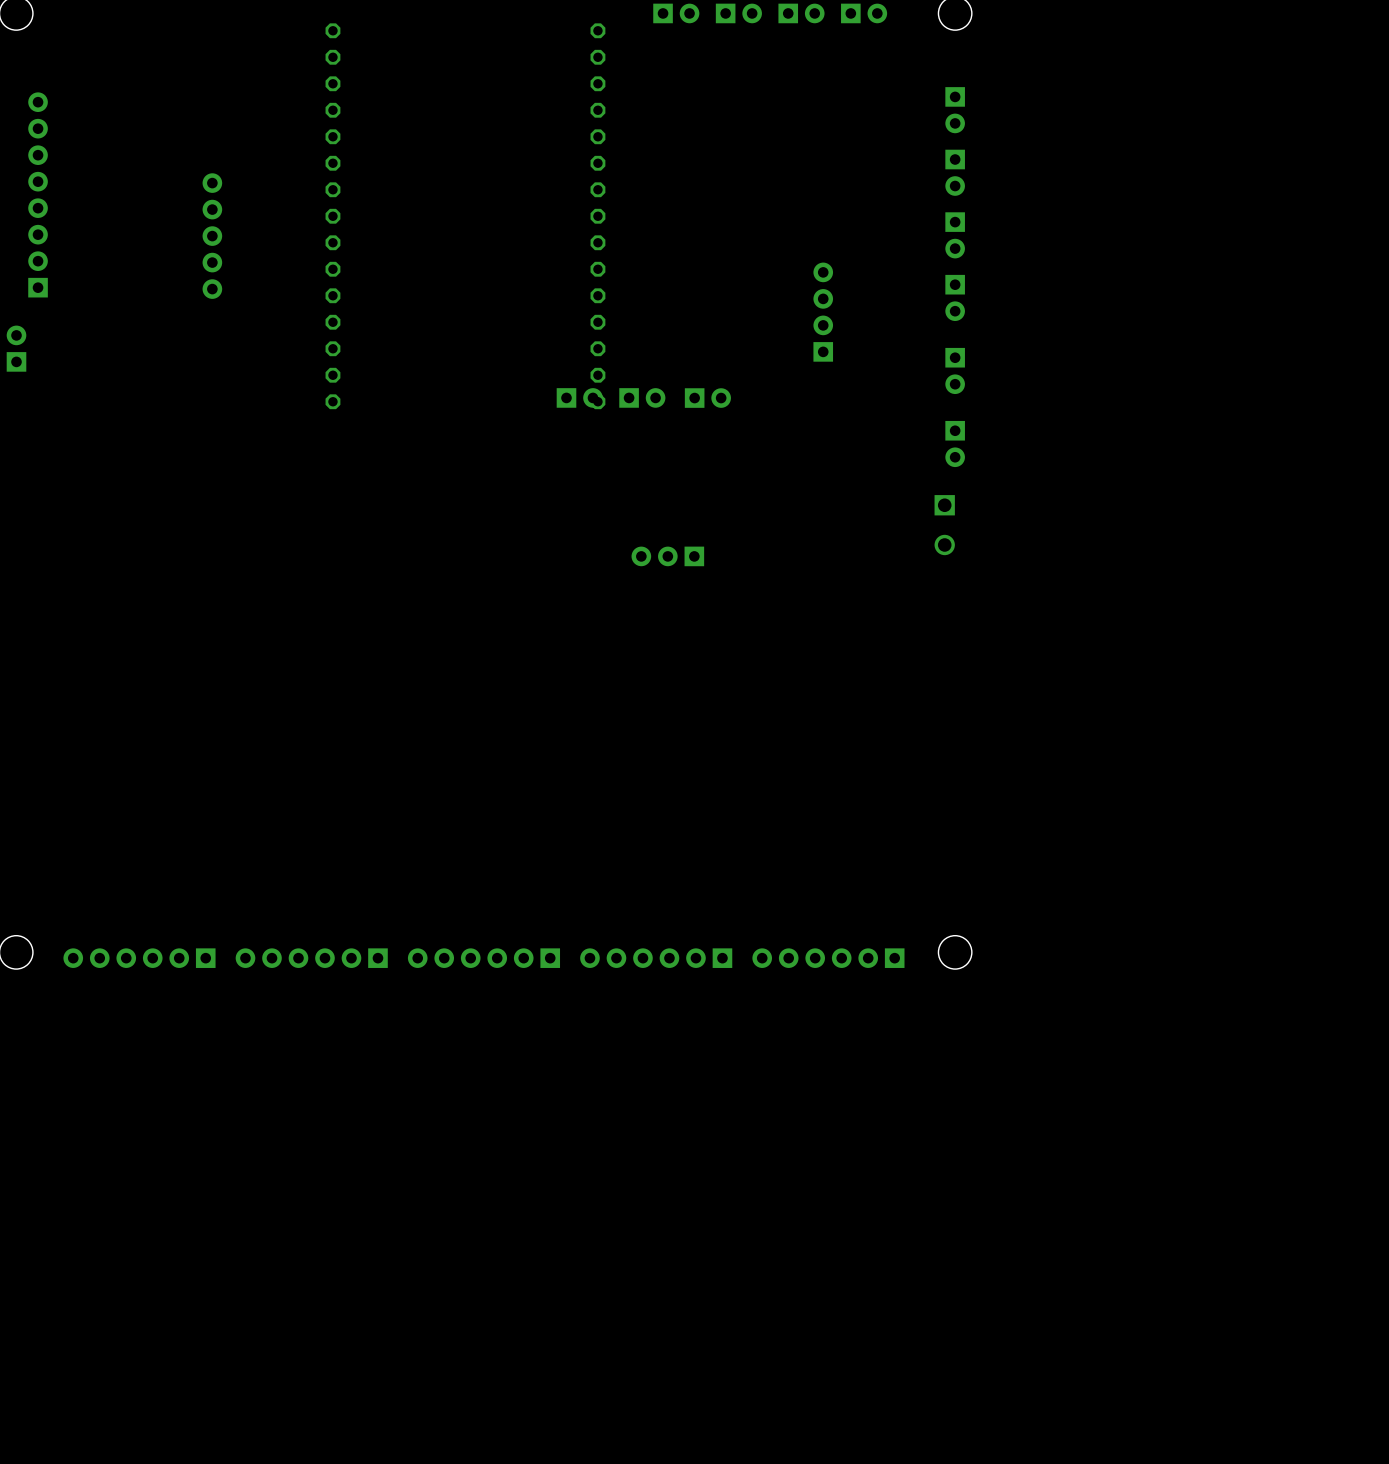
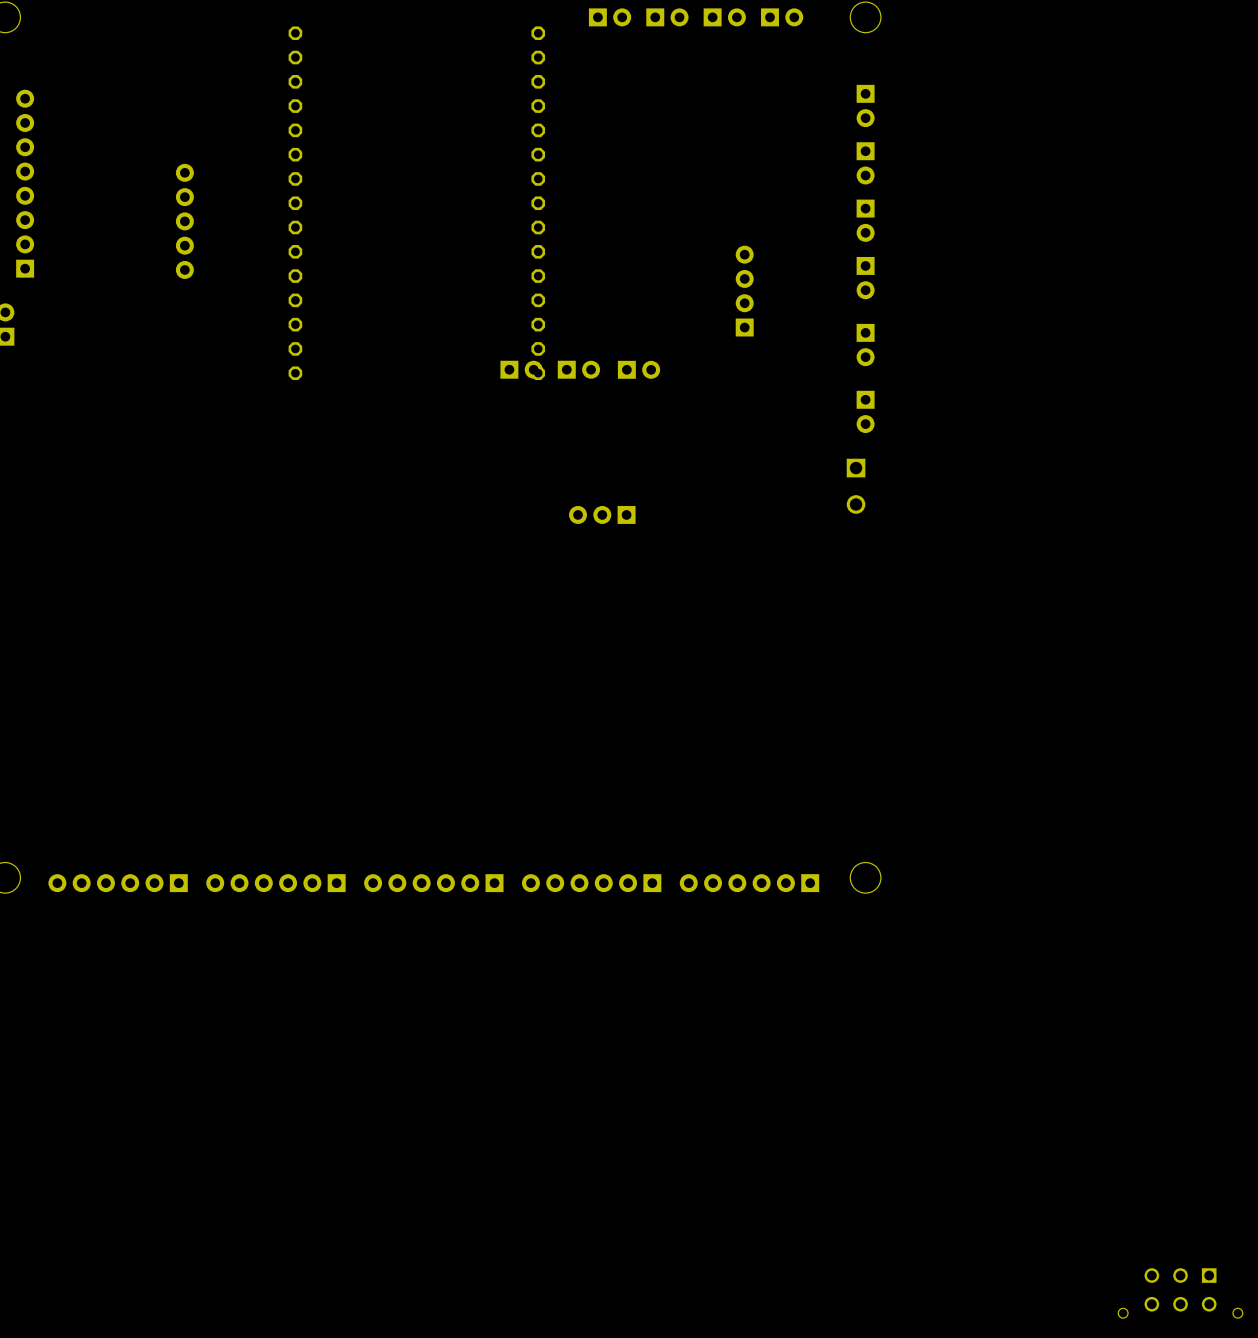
part: none -> (1180, 1293)

